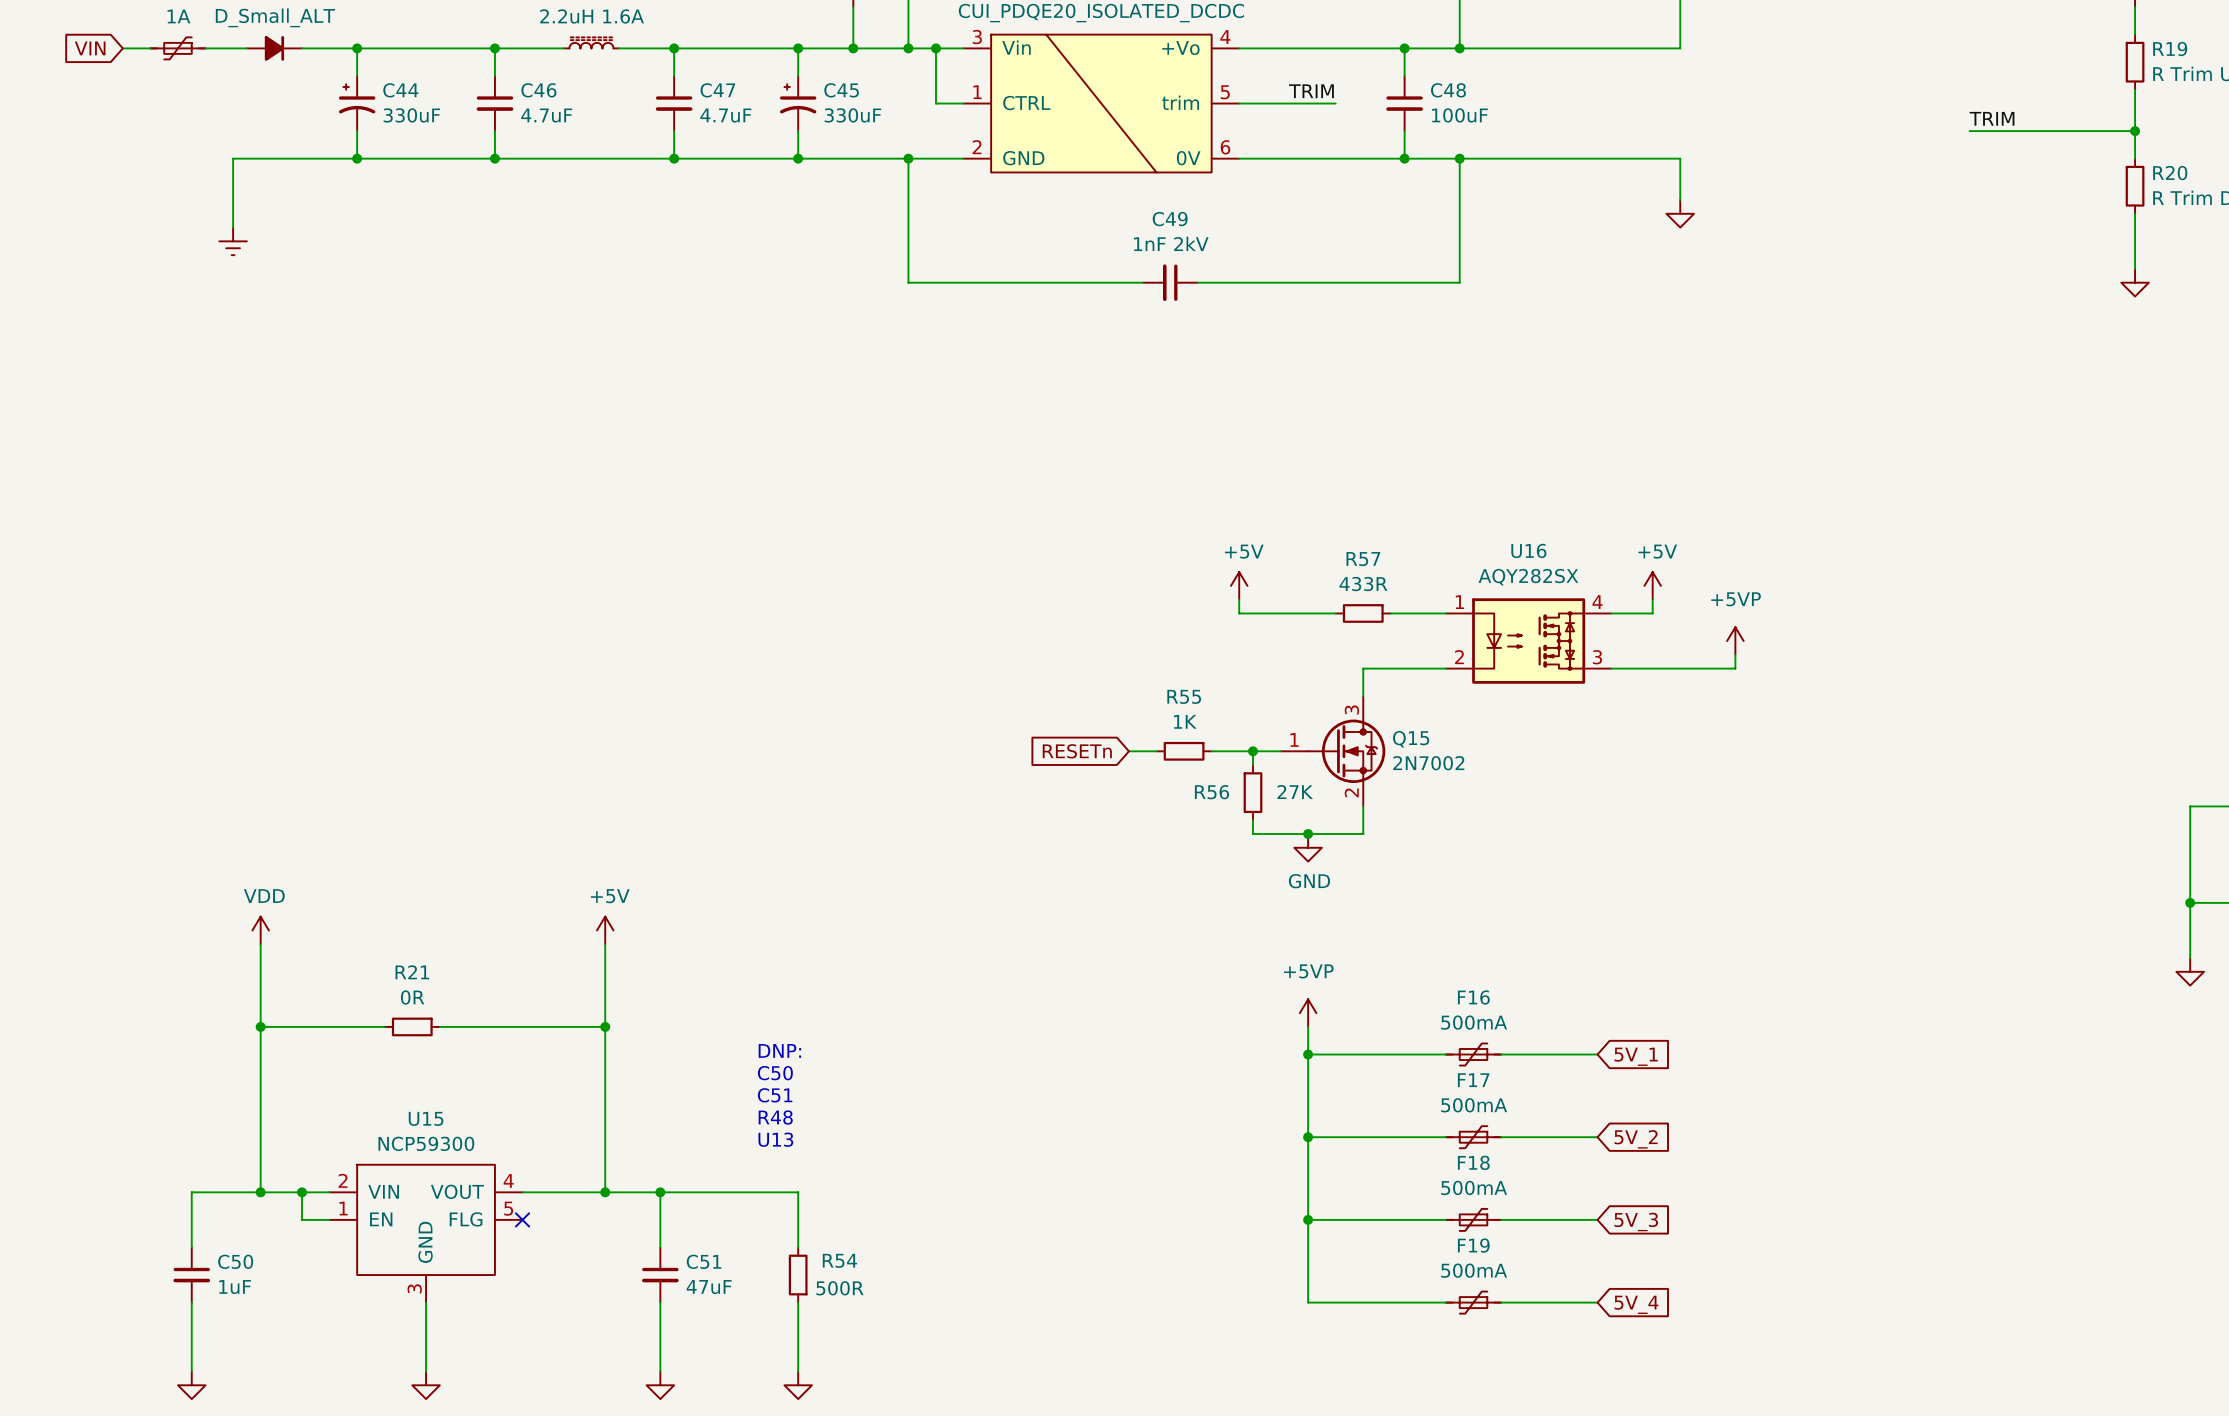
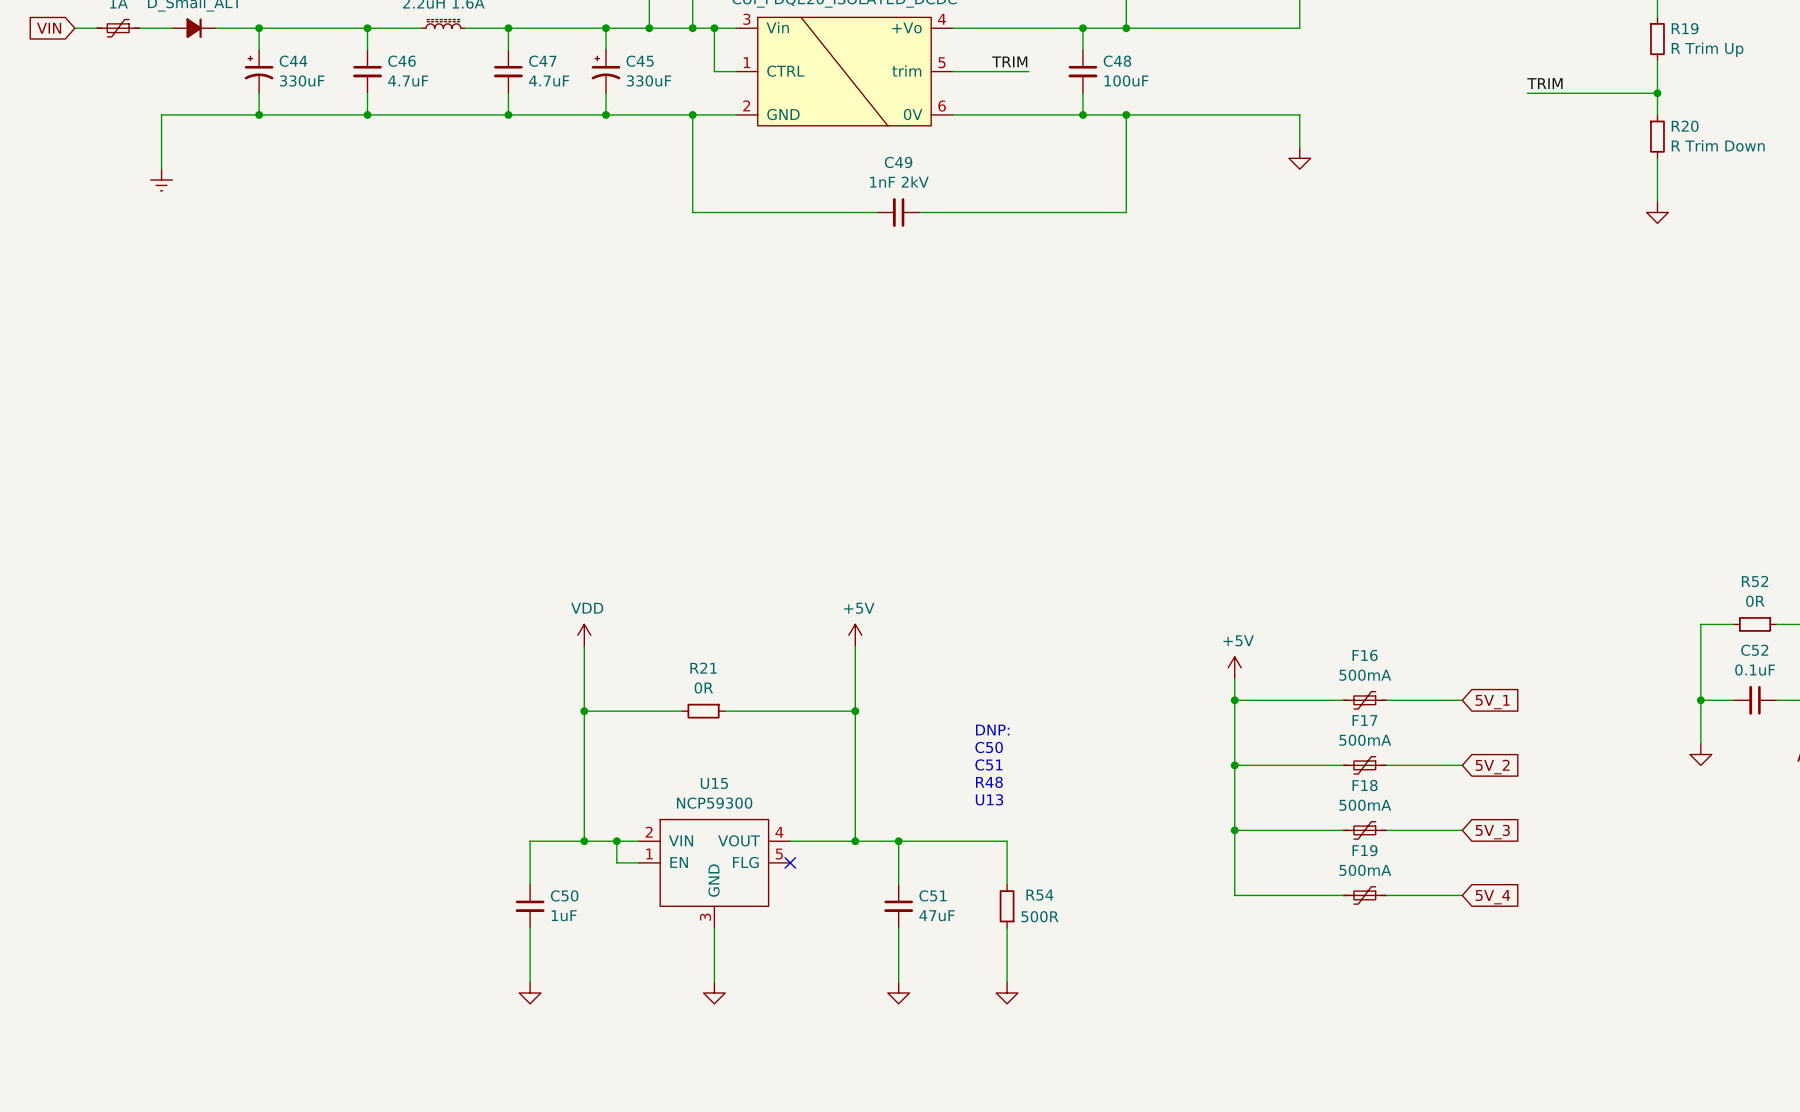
power symbol: +5V (1239, 585) -> none
power symbol: +5V (1652, 585) -> none
wire: (1239, 599) (1239, 613) (1335, 613) -> none
wire: (1652, 599) (1652, 613) (1611, 613) -> none
R57: 433R (1363, 613) -> none
wire: (1390, 613) (1445, 613) -> none
U16: AQY282SX (1528, 641) -> none
power symbol: +5VP (1735, 641) -> none
wire: (1735, 654) (1735, 668) (1611, 668) -> none
wire: (1445, 668) (1363, 668) (1363, 696) -> none
global label: RESETn (1077, 751) -> none
wire: (1128, 751) (1156, 751) -> none
R55: 1K (1184, 751) -> none
wire: (1211, 751) (1280, 751) -> none
wire: (1252, 751) (1252, 765) -> none
junction: (1252, 751) -> none
Q15: 2N7002 (1332, 751) -> none
R56: 27K (1252, 792) -> none
wire: (1363, 806) (1363, 833) (1252, 833) (1252, 820) -> none
power symbol: none -> VDD (584, 635)
power symbol: none -> +5V (855, 635)
wire: none -> (855, 646) (855, 841)
junction: (1308, 833) -> none
power symbol: GND (1308, 847) -> none
power symbol: none -> +5V (1234, 667)
wire: none -> (1234, 678) (1234, 895) (1343, 895)
wire: none -> (1234, 700) (1343, 700)
junction: none -> (1234, 700)
wire: none -> (1386, 700) (1462, 700)
global label: none -> 5V_1 (1492, 702)
wire: none -> (584, 711) (681, 711)
junction: none -> (584, 711)
wire: none -> (725, 711) (855, 711)
junction: none -> (855, 711)
power symbol: VDD (260, 930) -> none
power symbol: +5V (605, 930) -> none
text: none -> DNP: (992, 730)
wire: (260, 944) (260, 1192) -> none
wire: (605, 944) (605, 1192) -> (584, 646) (584, 841)
text: none -> C50 (989, 747)
text: none -> C51 (988, 764)
wire: none -> (1234, 765) (1343, 765)
junction: none -> (1234, 765)
wire: none -> (1386, 765) (1462, 765)
global label: none -> 5V_2 (1492, 767)
text: none -> R48 (989, 782)
power symbol: +5VP (1308, 1013) -> none
wire: (260, 1026) (384, 1026) -> none
junction: (260, 1026) -> none
R21 position: (412, 1026) -> (703, 711)
wire: (439, 1026) (605, 1026) -> none
junction: (605, 1026) -> none
wire: (1308, 1026) (1308, 1082) -> (790, 841) (1007, 841)
text: none -> U13 (989, 799)
text: DNP: (779, 1050) -> none
wire: (1308, 1054) (1445, 1054) -> none
junction: (1308, 1054) -> none
F16 position: (1473, 1054) -> (1364, 700)
wire: (1501, 1054) (1597, 1054) -> none
global label: 5V_1 (1636, 1056) -> none
wire: none -> (1234, 830) (1343, 830)
junction: none -> (1234, 830)
wire: none -> (1386, 830) (1462, 830)
global label: none -> 5V_3 (1492, 832)
text: C50 (775, 1073) -> none
junction: none -> (584, 841)
wire: none -> (616, 841) (616, 862) (638, 862)
junction: none -> (616, 841)
wire: none -> (638, 841) (530, 841) (530, 884)
junction: none -> (855, 841)
wire: none -> (898, 841) (898, 884)
junction: none -> (898, 841)
text: C51 (775, 1095) -> none
no-connect mark: none -> (790, 862)
text: R48 (775, 1117) -> none
junction: (1308, 1137) -> none
wire: (1445, 1137) (1308, 1137) (1308, 1192) -> none
F17 position: (1473, 1137) -> (1364, 765)
wire: (1501, 1137) (1597, 1137) -> none
text: U13 (775, 1139) -> none
global label: 5V_2 (1636, 1139) -> none
wire: none -> (1386, 895) (1462, 895)
global label: none -> 5V_4 (1492, 897)
junction: (260, 1192) -> none
wire: (302, 1192) (302, 1219) (329, 1219) -> none
junction: (302, 1192) -> none
wire: (329, 1192) (191, 1192) (191, 1247) -> none
wire: (522, 1192) (798, 1192) (798, 1247) -> none
junction: (605, 1192) -> none
wire: (660, 1192) (660, 1247) -> none
junction: (660, 1192) -> none
wire: none -> (898, 927) (898, 982)
no-connect mark: (522, 1219) -> none
wire: (1308, 1219) (1445, 1219) -> none
junction: (1308, 1219) -> none
F18 position: (1473, 1219) -> (1364, 830)
wire: (1501, 1219) (1597, 1219) -> none
global label: 5V_3 (1636, 1222) -> none
U15 position: (426, 1233) -> (714, 873)
wire: (1308, 1261) (1308, 1302) (1445, 1302) -> none
C50 position: (191, 1275) -> (530, 906)
C51 position: (660, 1275) -> (898, 906)
power symbol: none -> (530, 993)
R54 position: (798, 1275) -> (1007, 906)
power symbol: none -> (714, 993)
power symbol: none -> (898, 993)
power symbol: none -> (1007, 993)
wire: (191, 1302) (191, 1371) -> none
wire: (426, 1302) (426, 1371) -> none
wire: (660, 1302) (660, 1371) -> (530, 927) (530, 982)
wire: (798, 1302) (798, 1371) -> (714, 927) (714, 982)
F19 position: (1473, 1302) -> (1364, 895)
wire: (1501, 1302) (1597, 1302) -> none
global label: 5V_4 (1636, 1304) -> none
power symbol: (191, 1385) -> none
power symbol: (426, 1385) -> none
power symbol: (660, 1385) -> none
power symbol: (798, 1385) -> none

